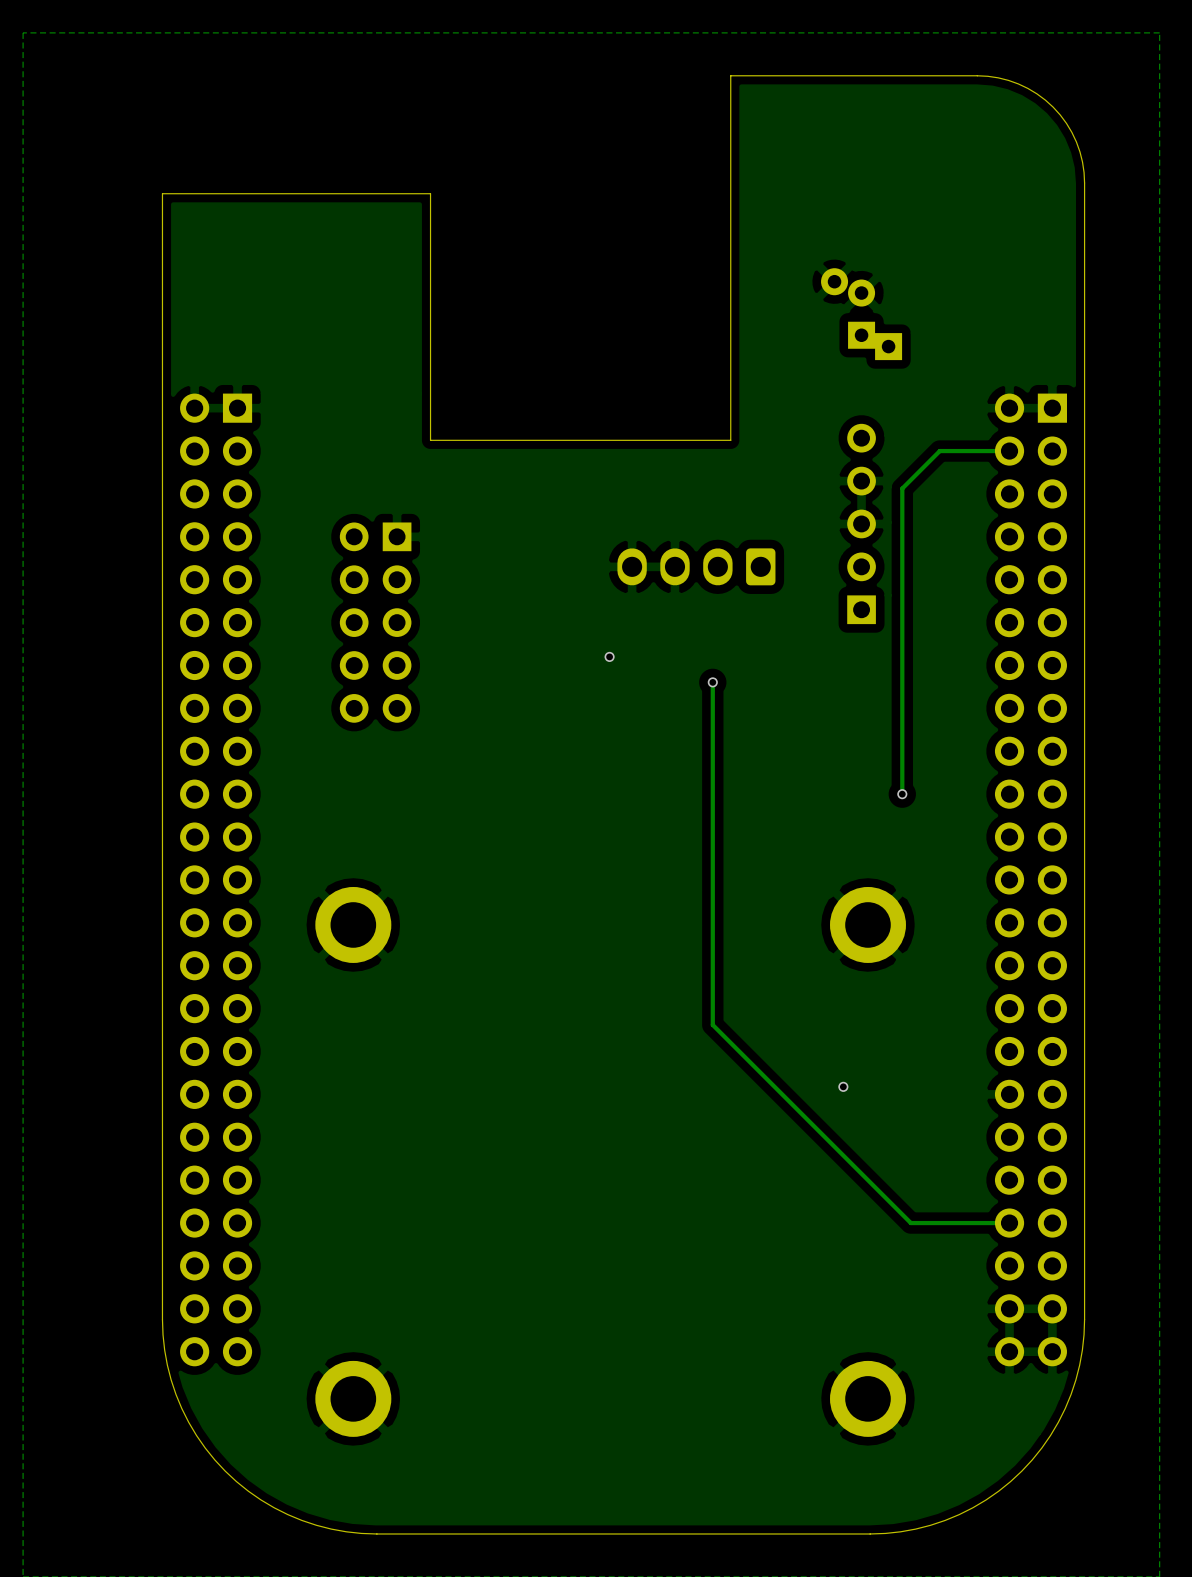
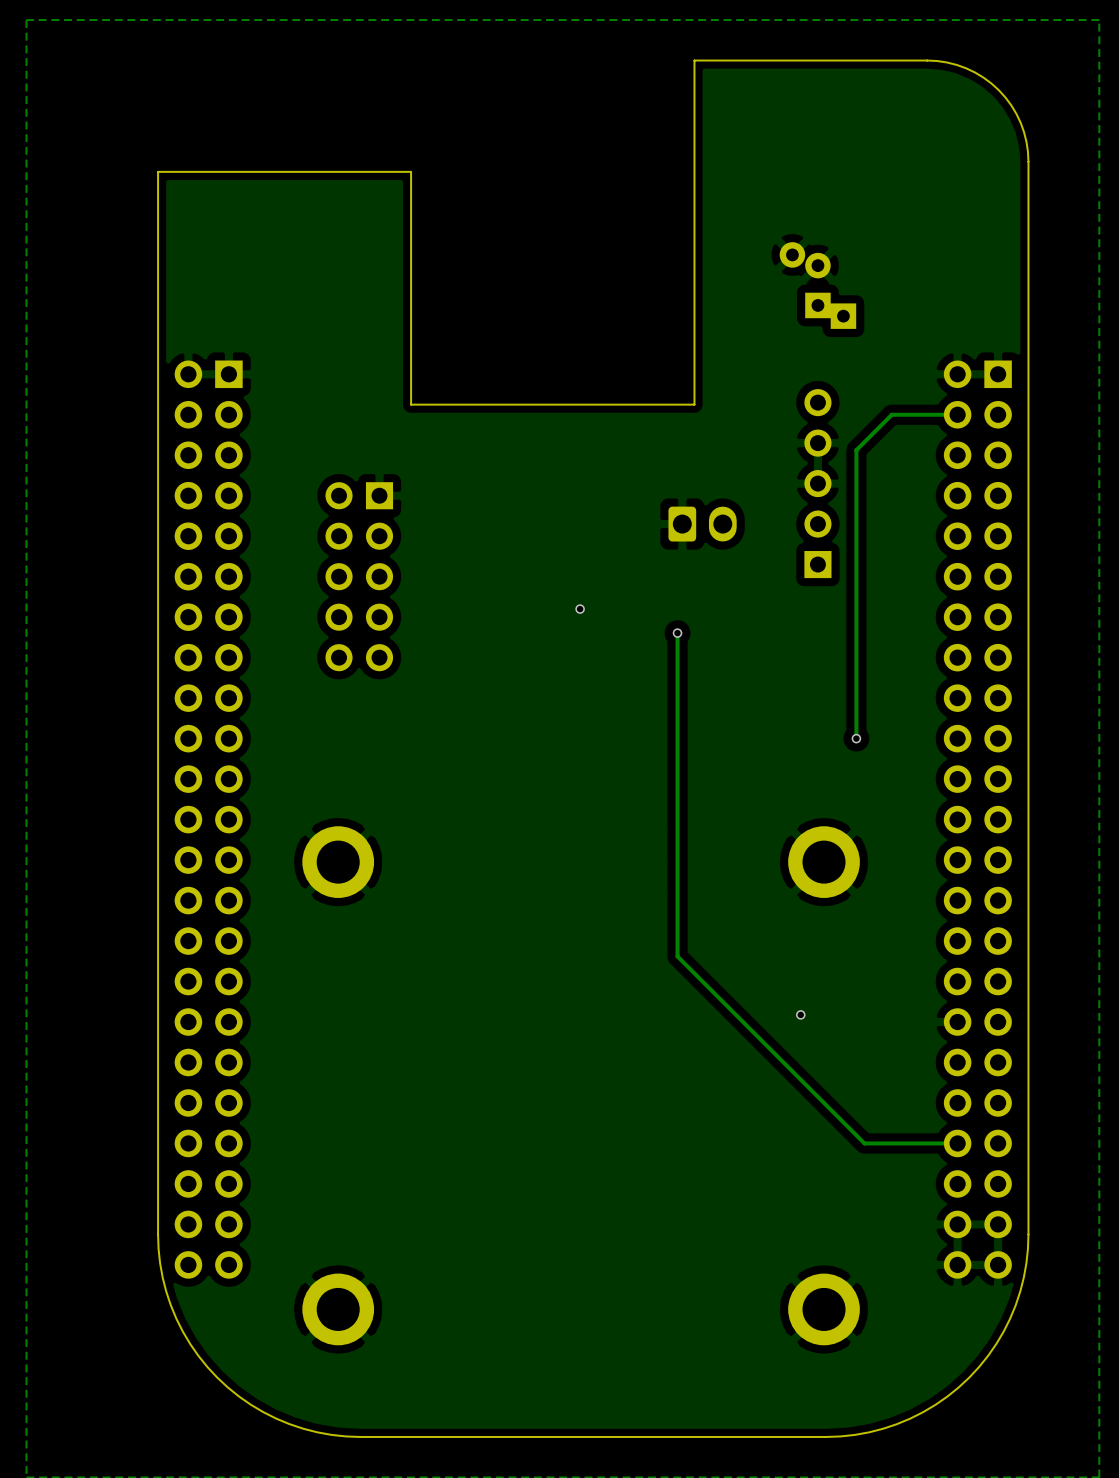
part: (696, 566) -> none
part: none -> (702, 524)

